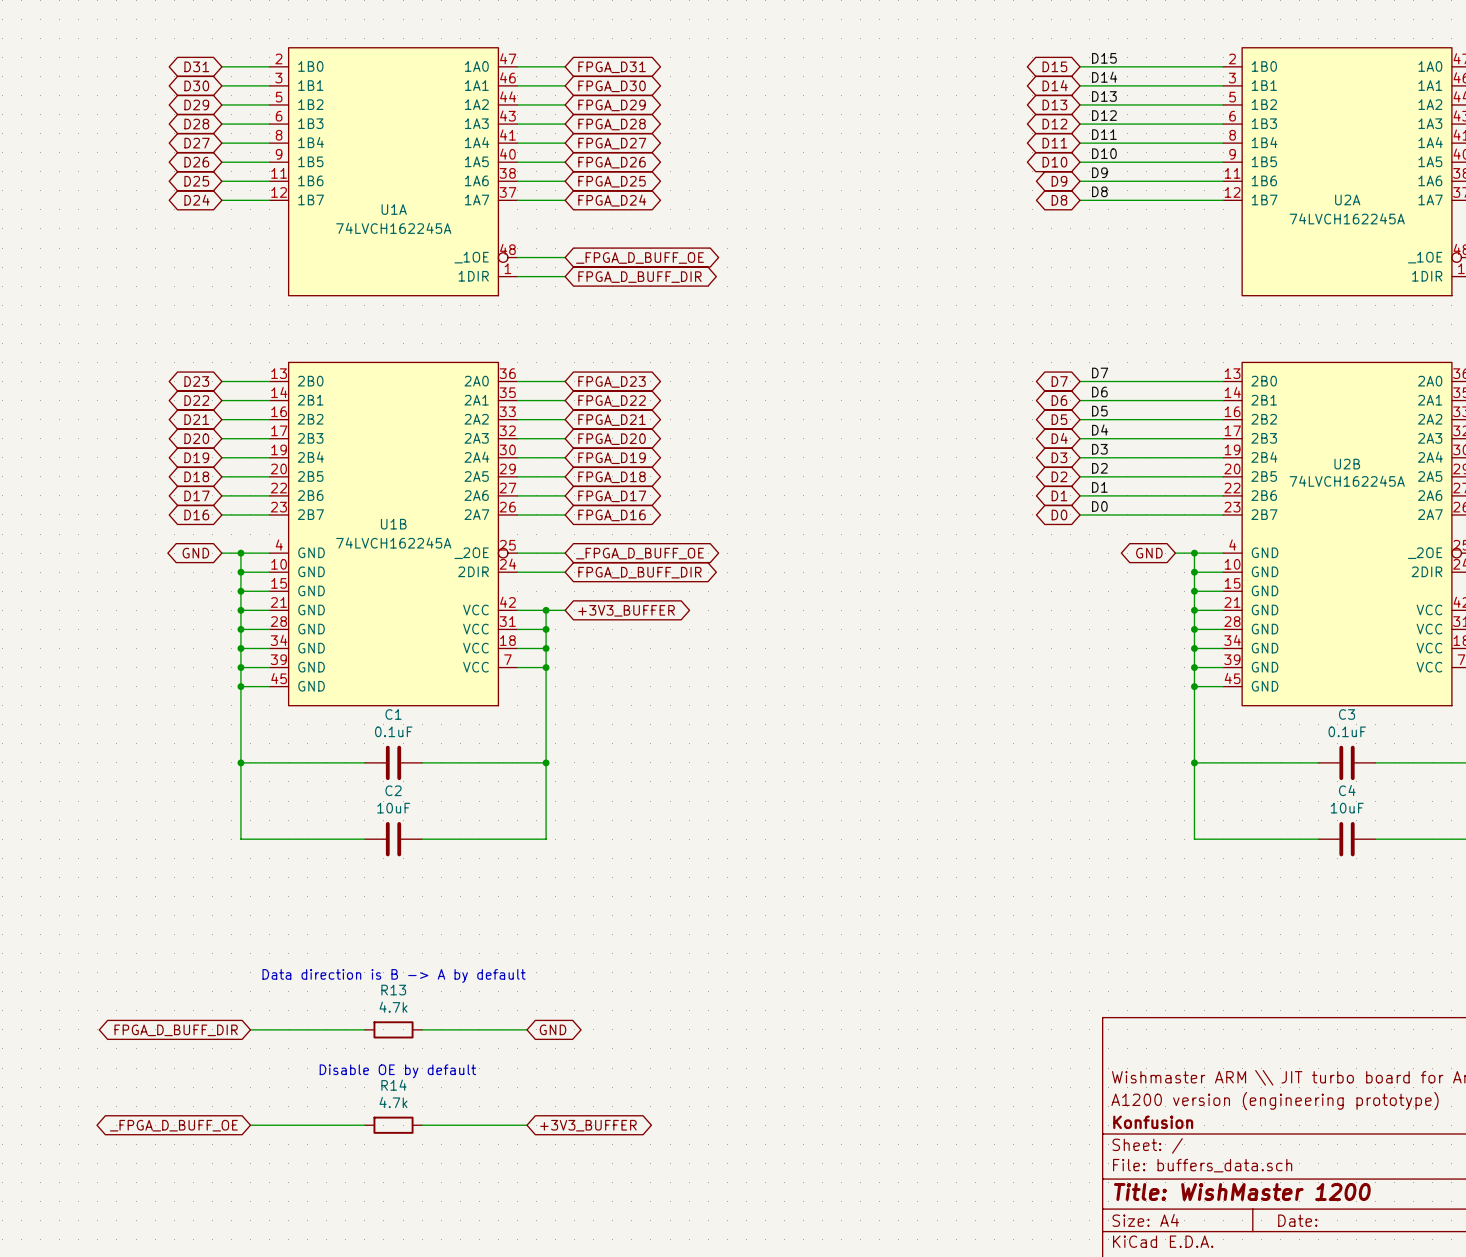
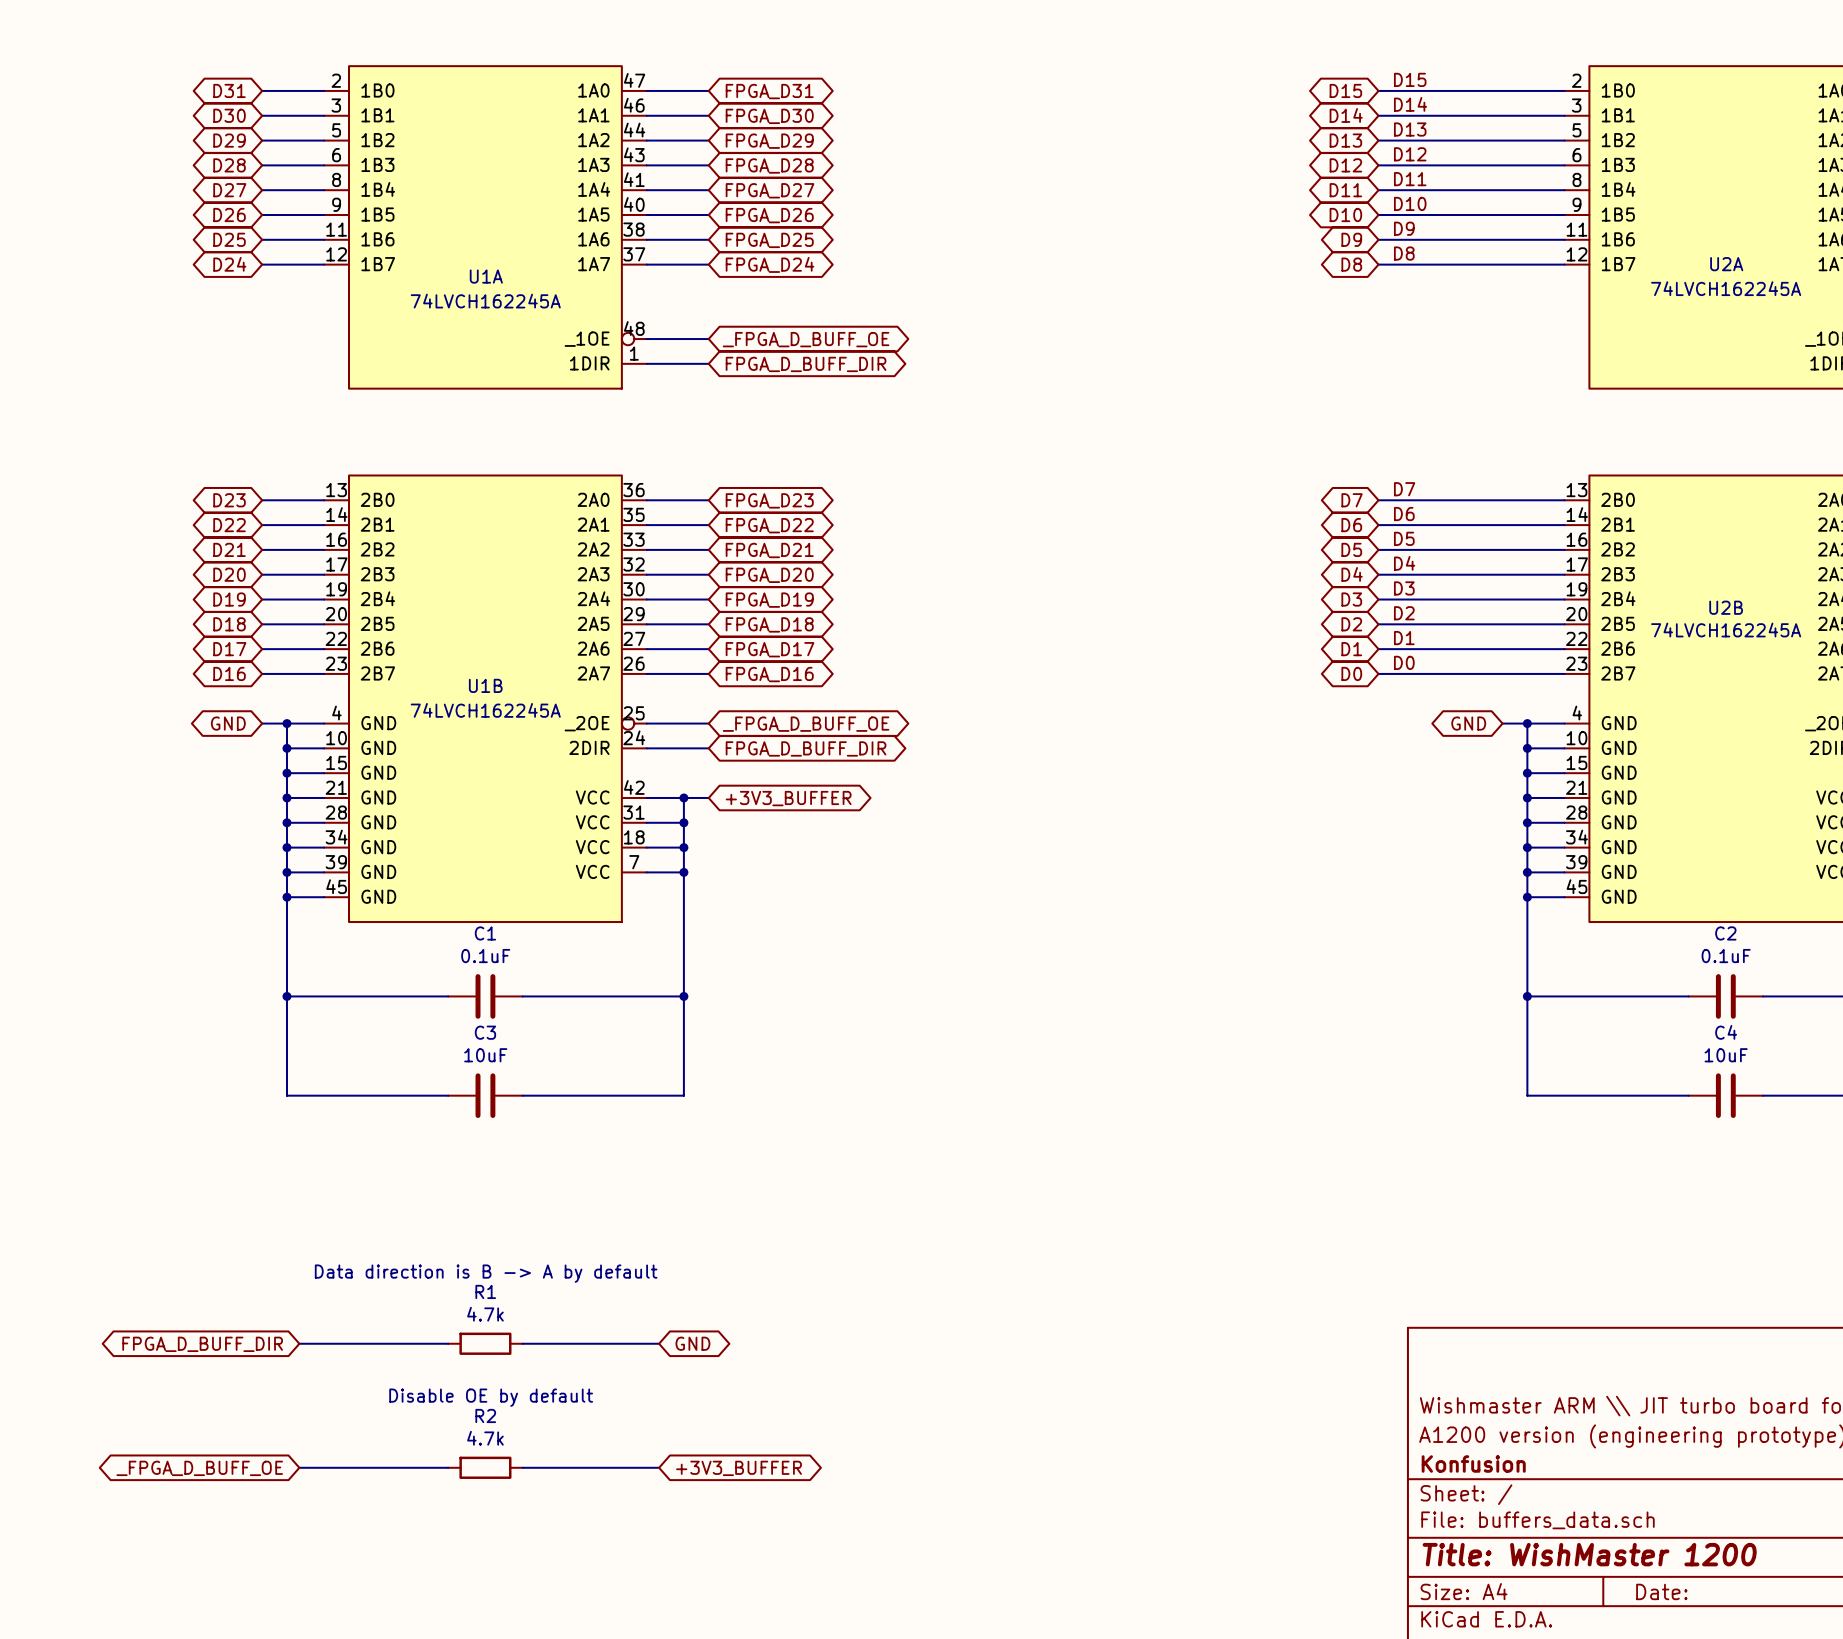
C3 name: C3 (1347, 714) -> C2 (1725, 933)
C2 name: C2 (393, 790) -> C3 (485, 1032)
R13 name: R13 (393, 990) -> R1 (485, 1291)
R14 name: R14 (393, 1085) -> R2 (485, 1415)

